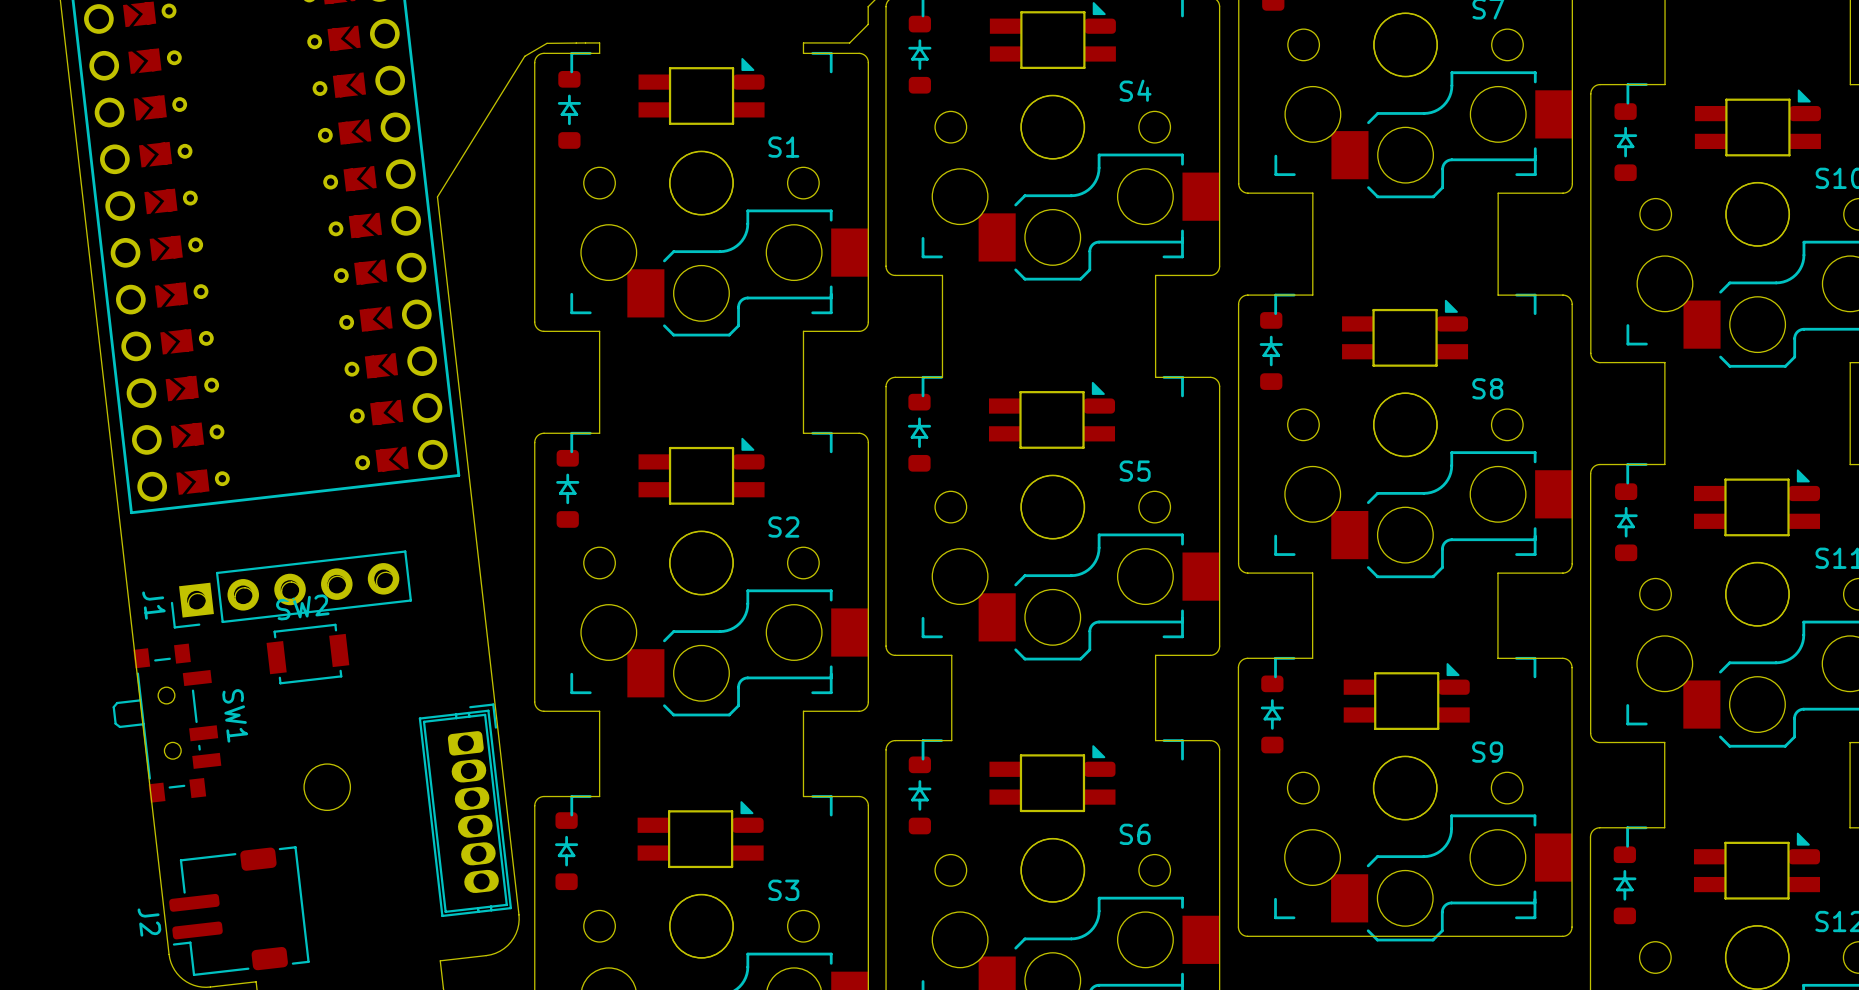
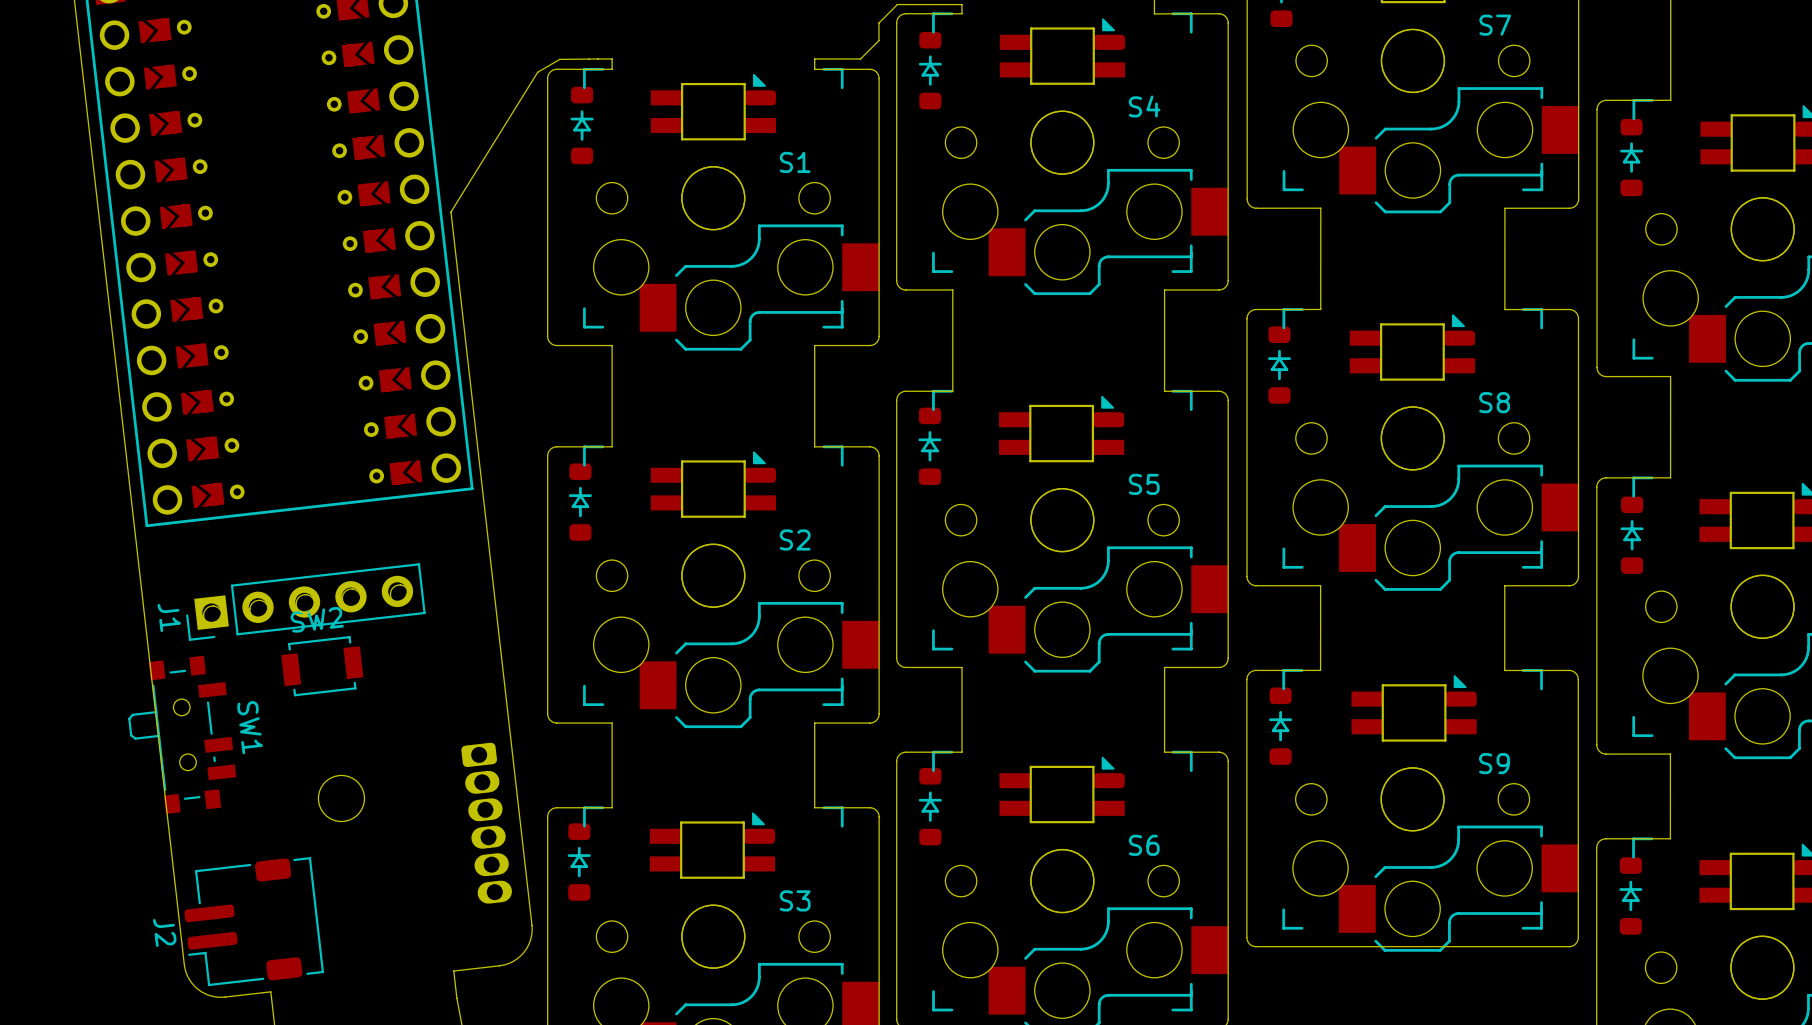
part footprint: [418, 703, 513, 918] -> [461, 742, 512, 904]

